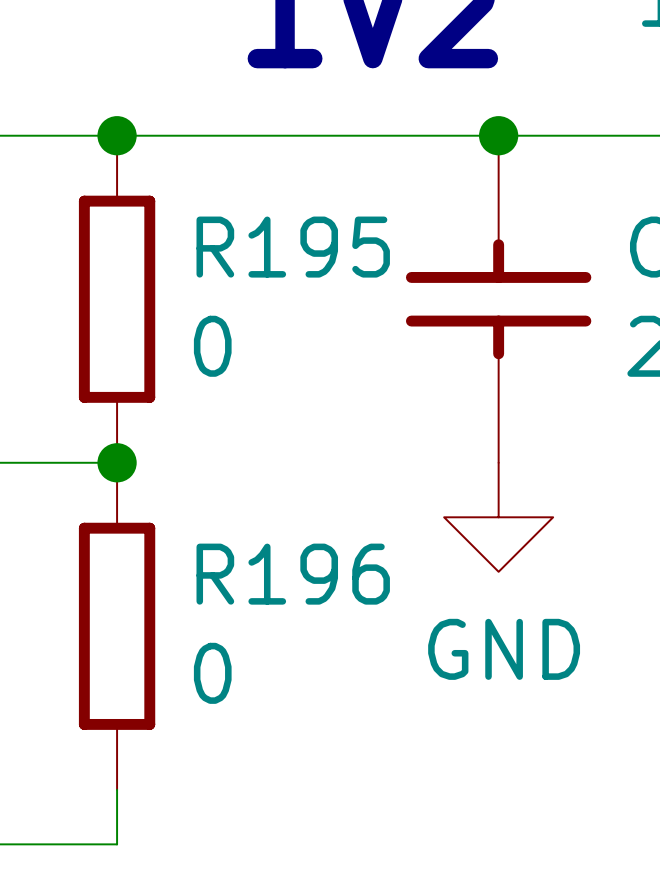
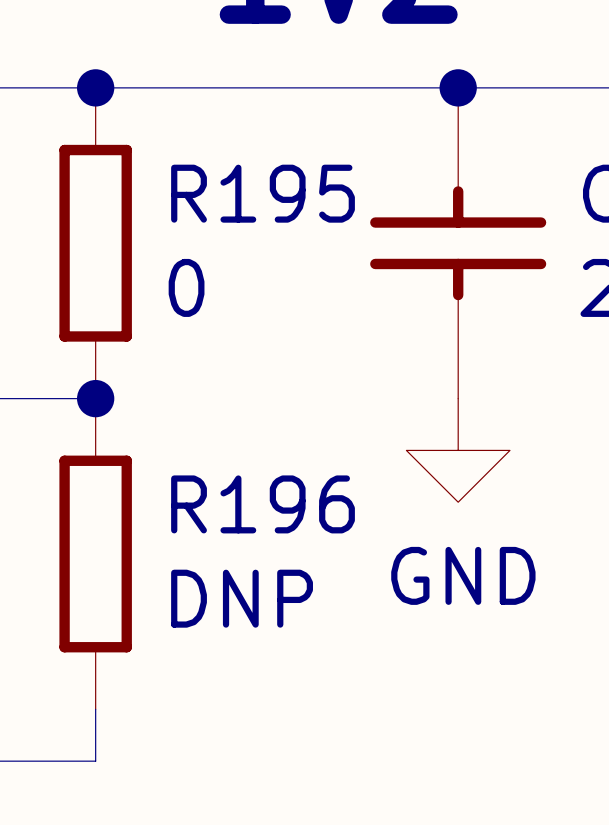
R196 text: 0 (212, 673) -> none
R196 text: none -> DNP (242, 598)

